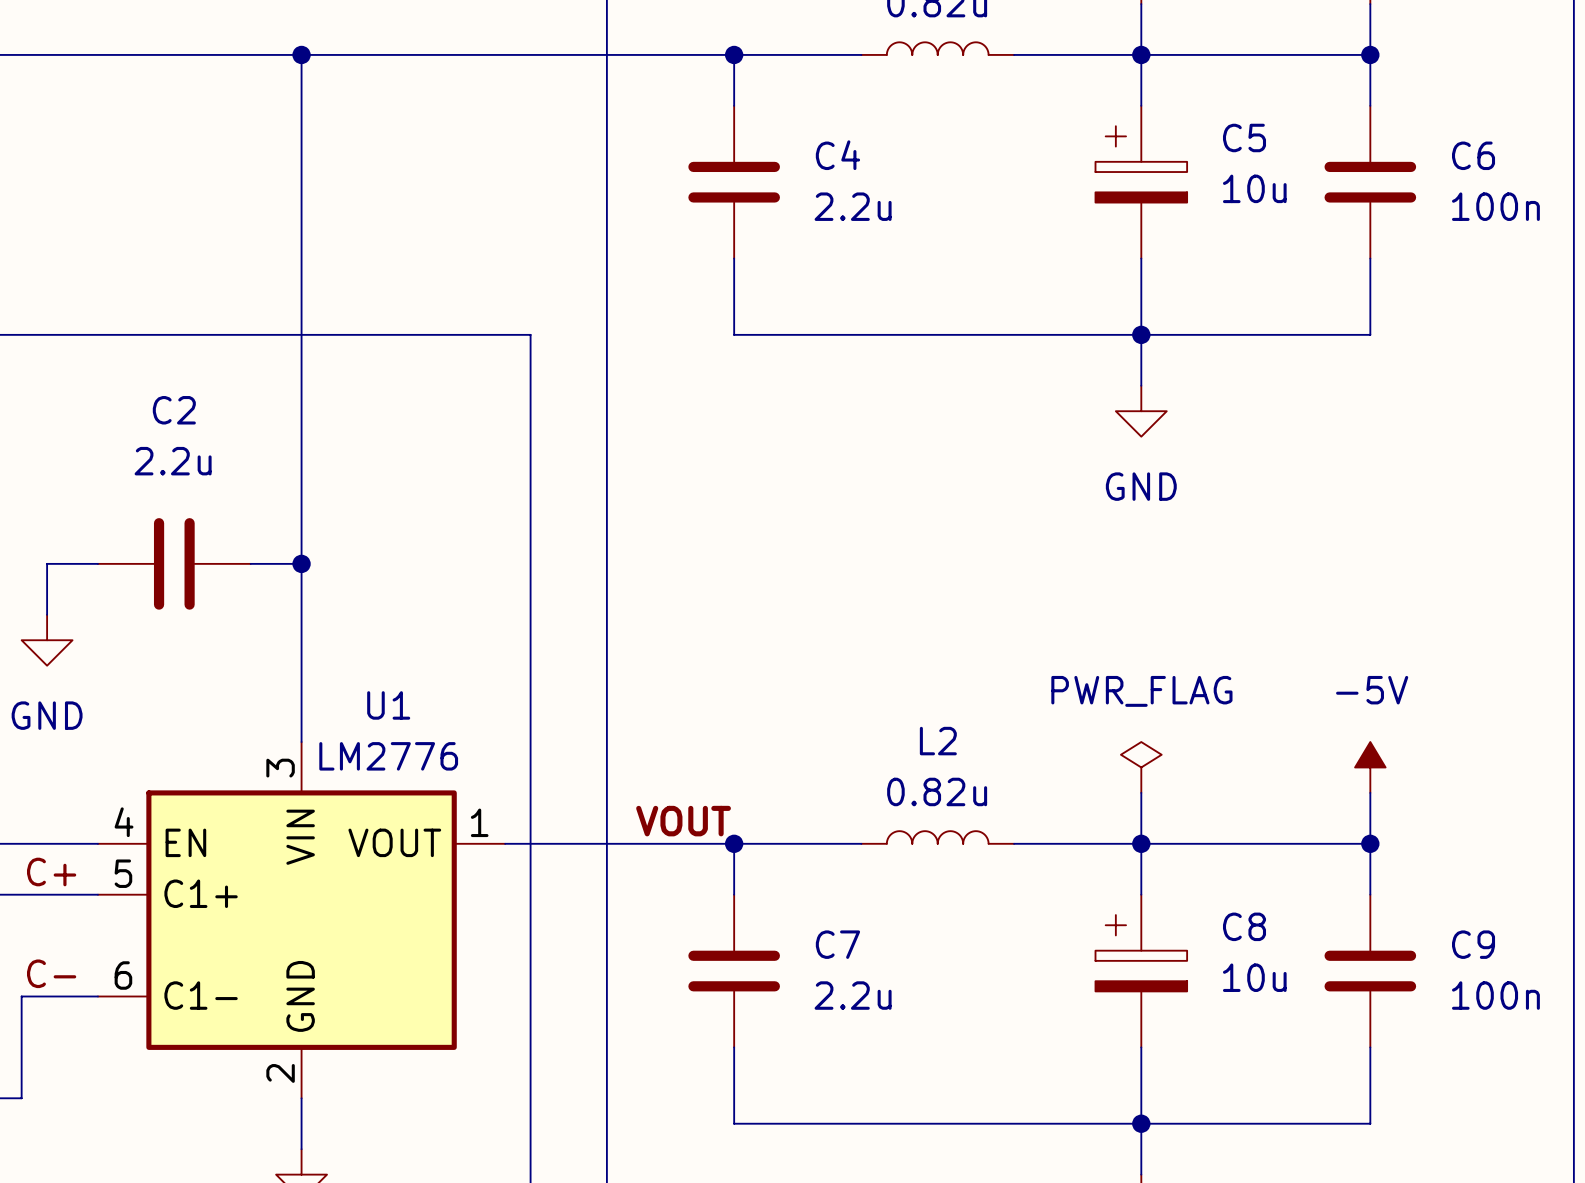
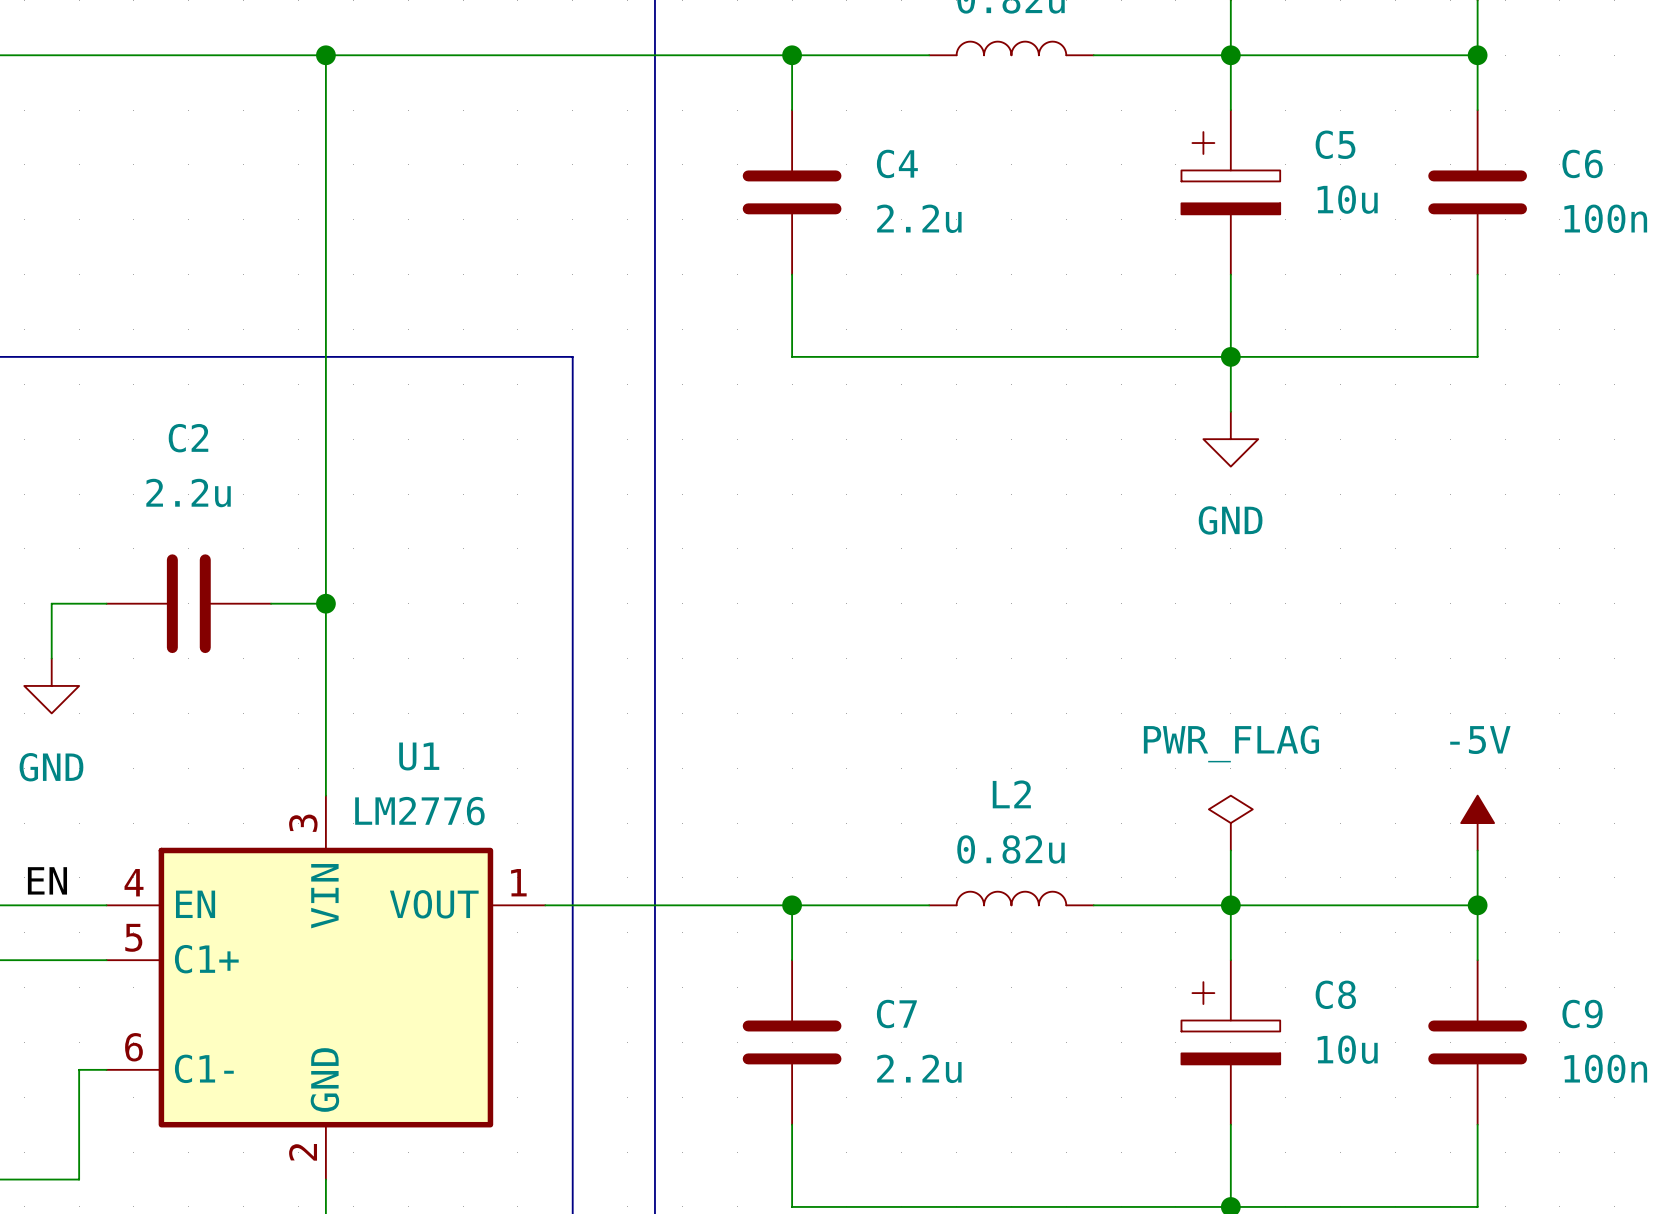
label: none -> EN (47, 880)
label: VOUT (683, 821) -> none
label: C+ (51, 872) -> none
label: C- (51, 973) -> none
wire: (72, 996) (21, 996) (21, 1098) -> (79, 1069) (79, 1179) (24, 1179)

